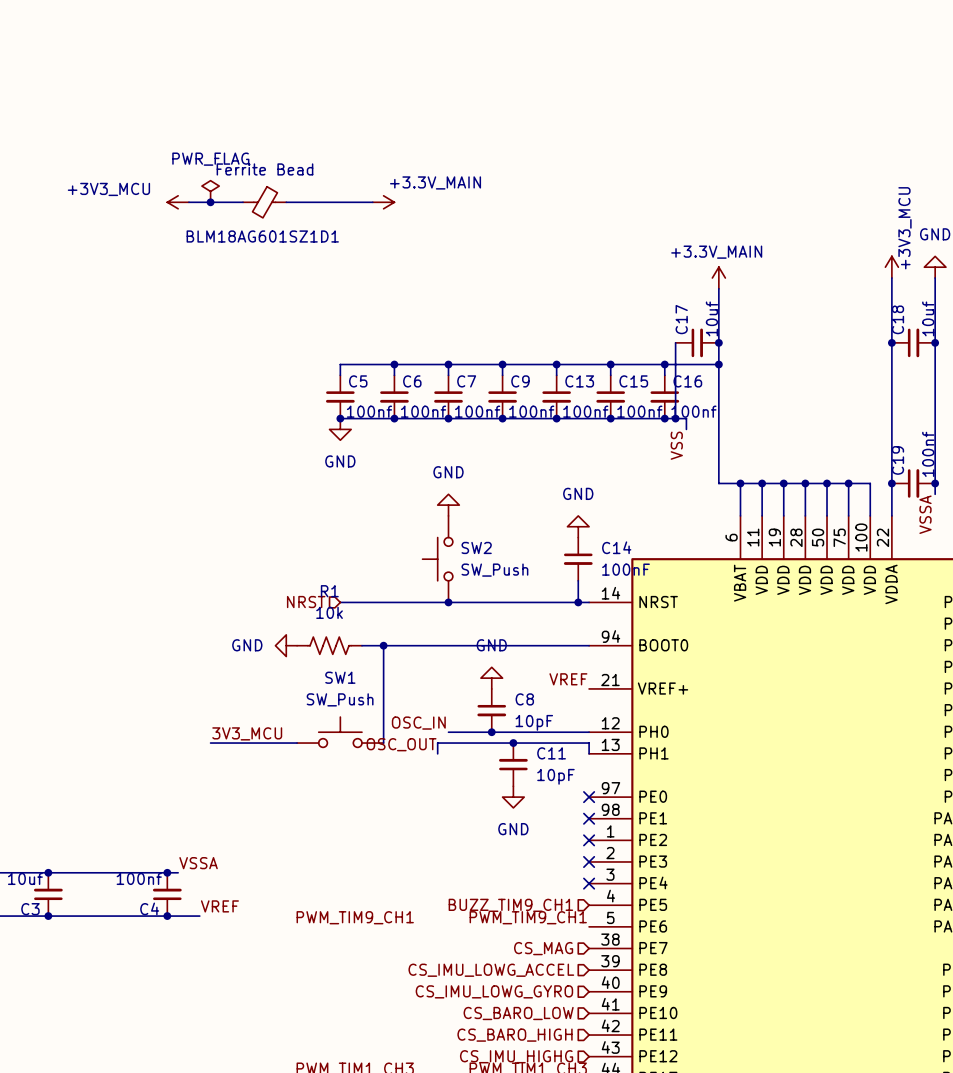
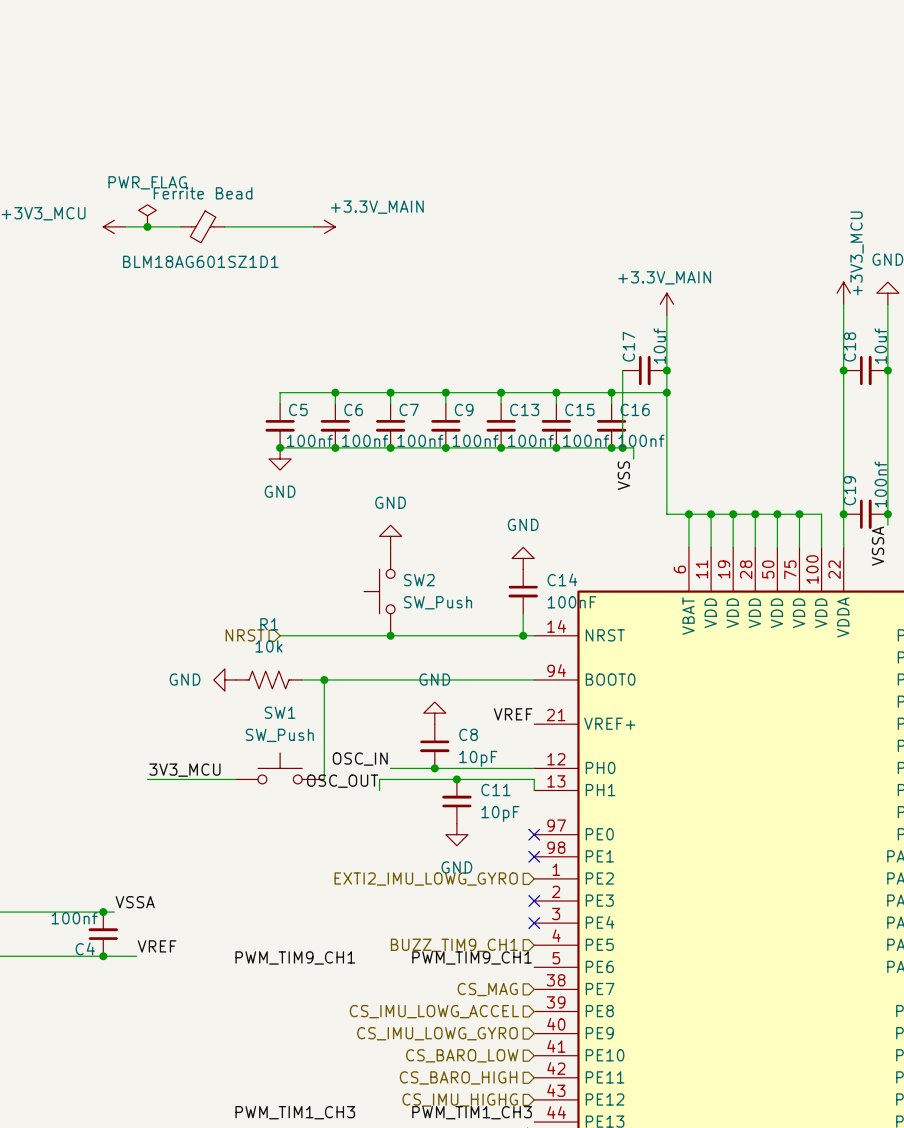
hierarchical label: none -> EXTI2_IMU_LOWG_GYRO (426, 879)
no-connect mark: (589, 840) -> none

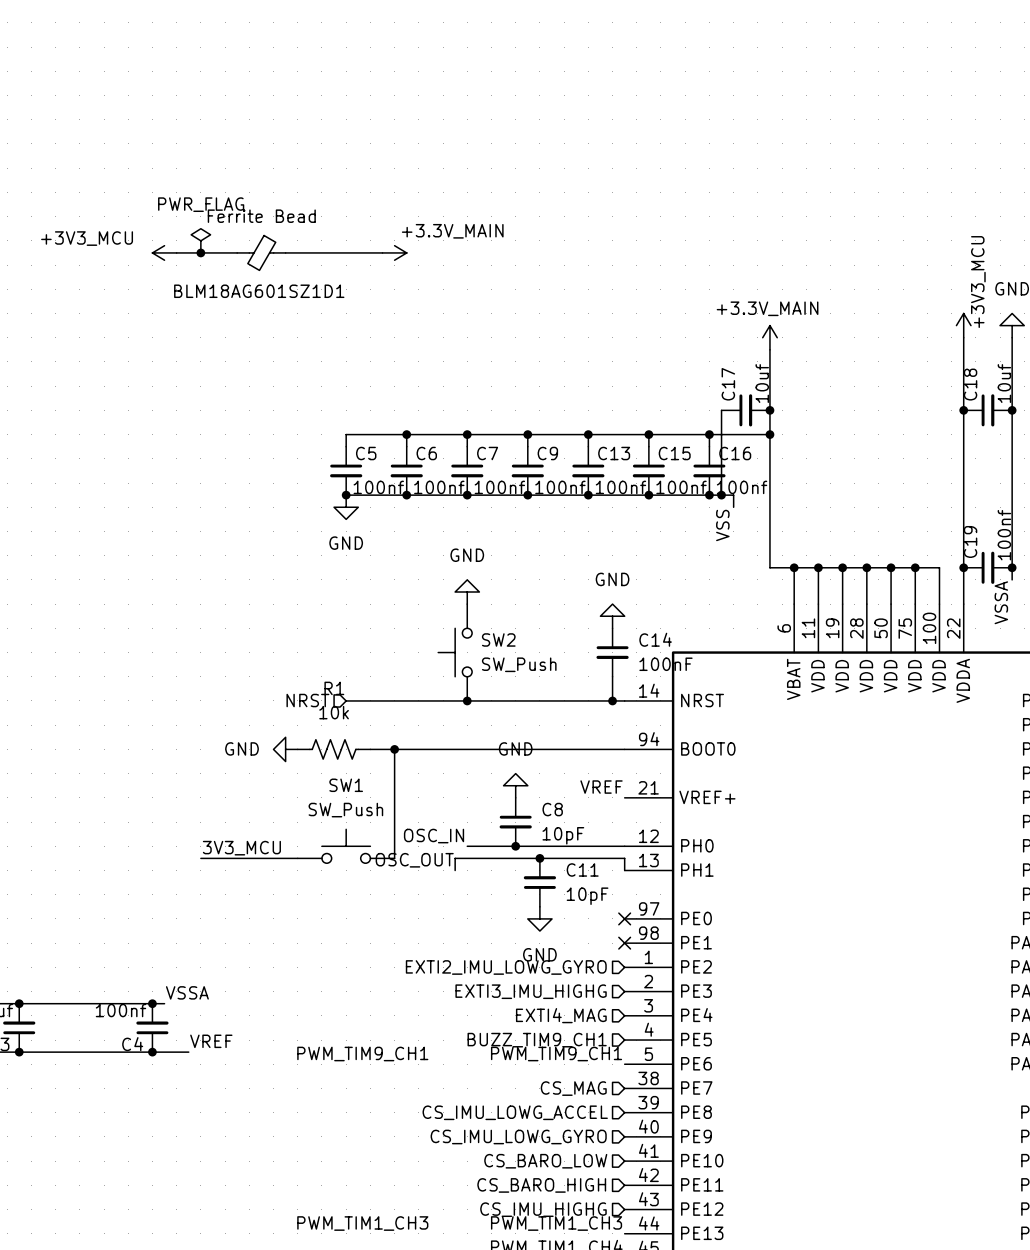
hierarchical label: none -> EXTI3_IMU_HIGHG (531, 991)
no-connect mark: (534, 901) -> none
hierarchical label: none -> EXTI4_MAG (561, 1015)
no-connect mark: (534, 923) -> none

